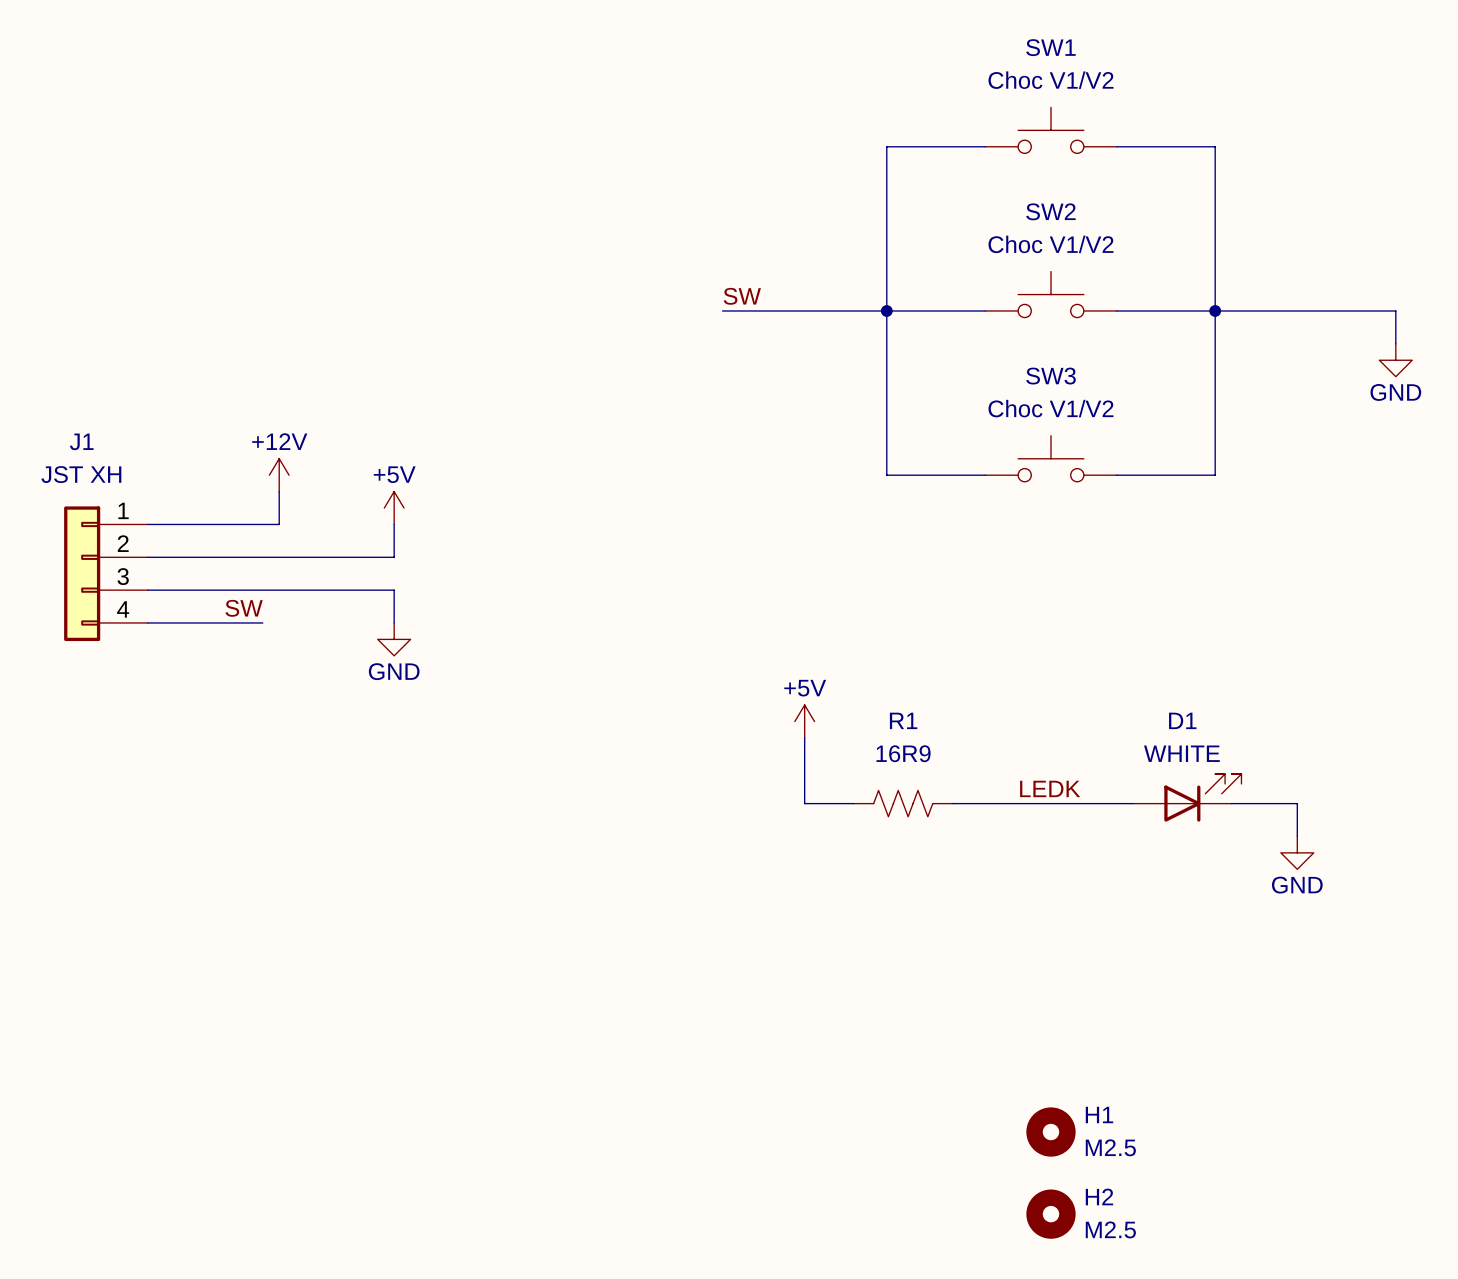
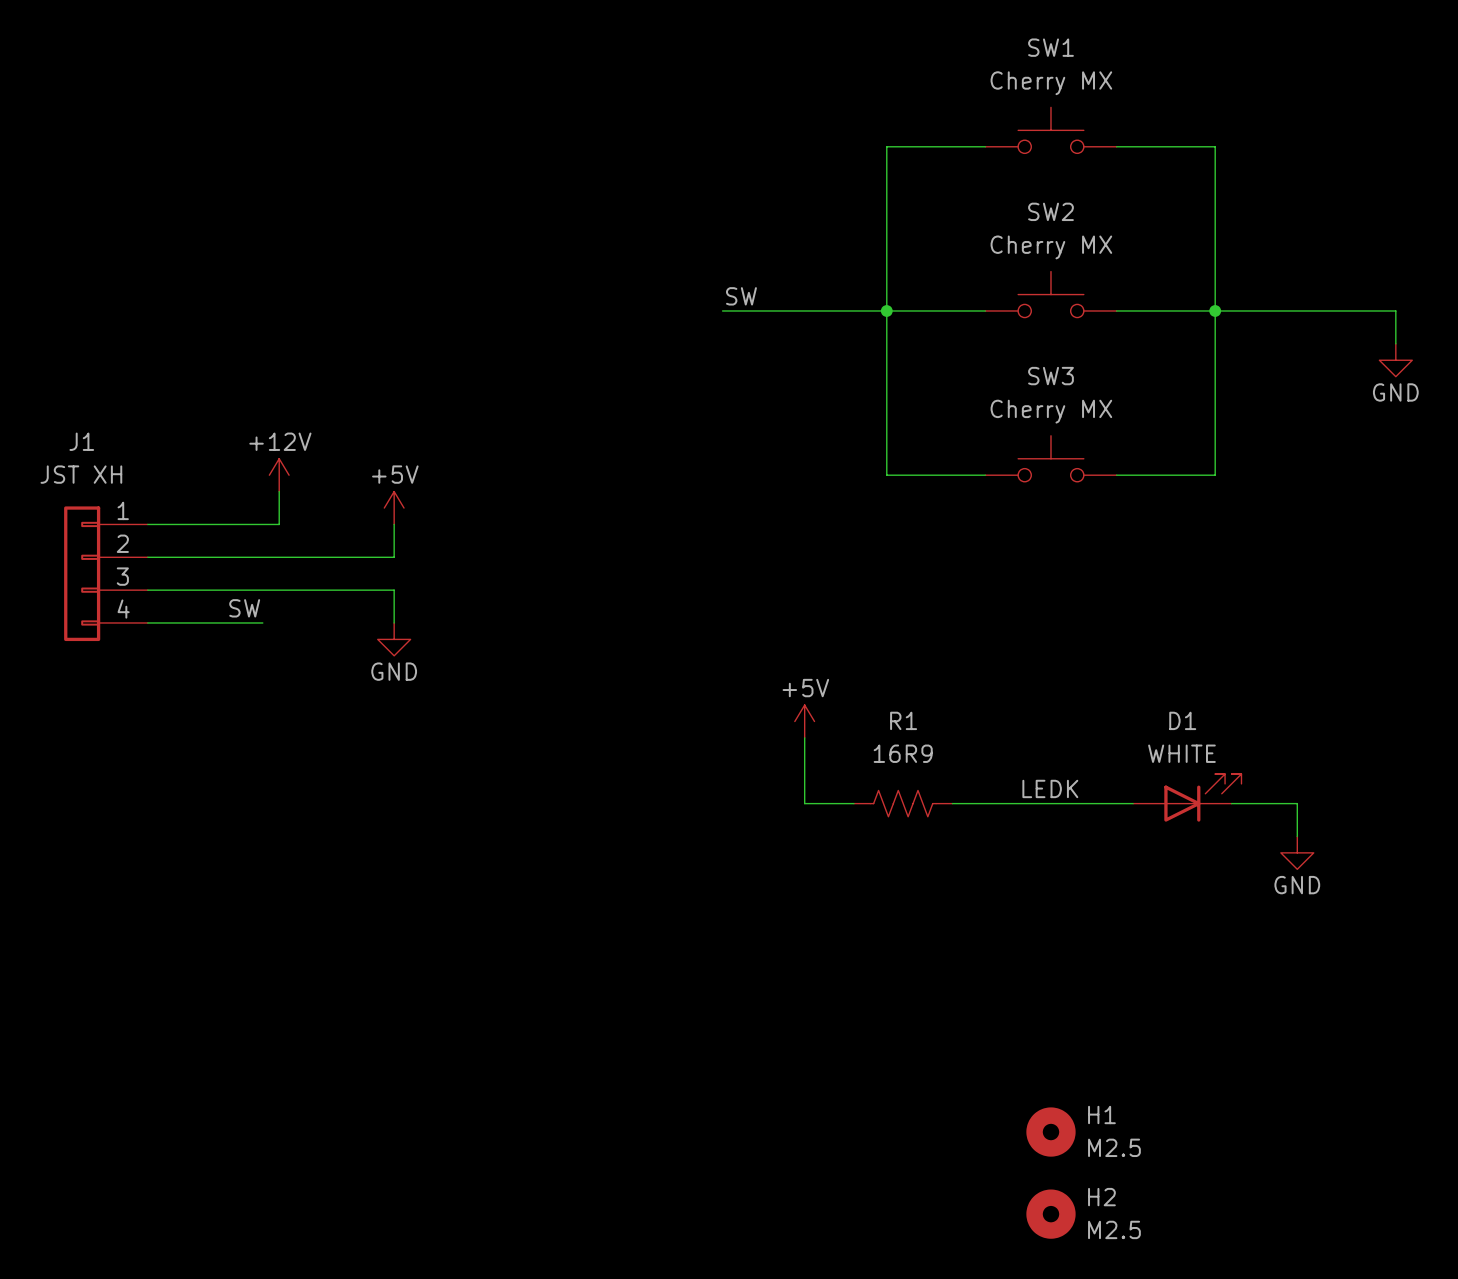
SW1 value: Choc V1/V2 (1051, 80) -> Cherry MX (1051, 83)
SW2 value: Choc V1/V2 (1051, 244) -> Cherry MX (1051, 247)
SW3 value: Choc V1/V2 (1051, 408) -> Cherry MX (1051, 411)

